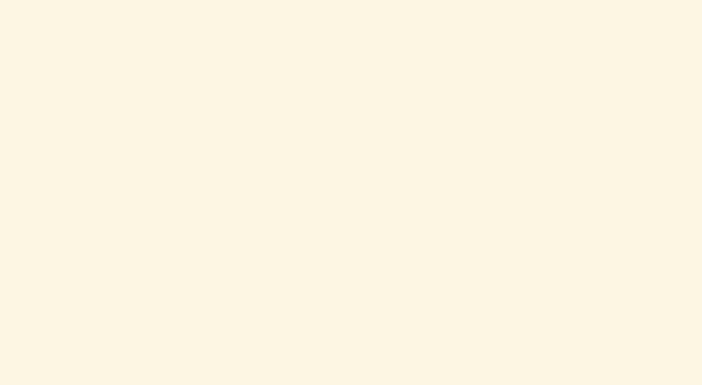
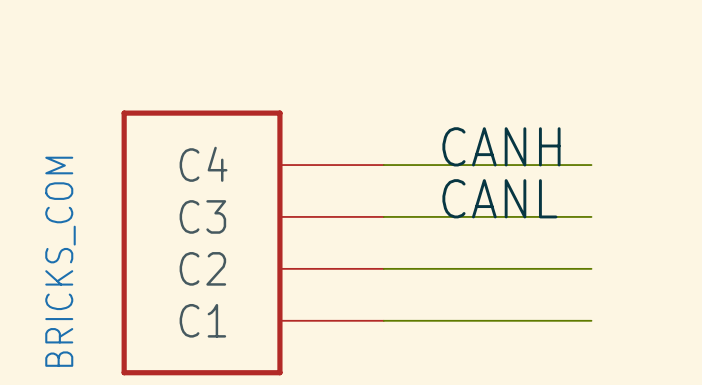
label: none -> CANH (501, 146)
wire: none -> (383, 165) (591, 165)
label: none -> CANL (499, 198)
wire: none -> (383, 216) (591, 216)
BRICKS_COM: none -> (252, 242)
wire: none -> (383, 268) (591, 268)
wire: none -> (383, 320) (591, 320)

